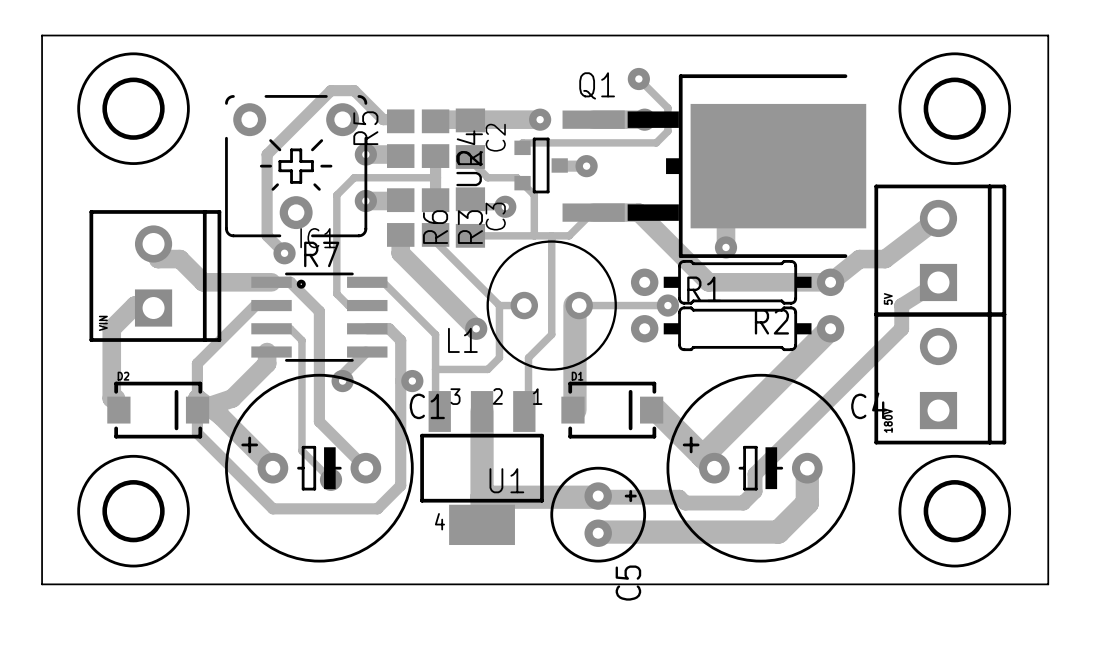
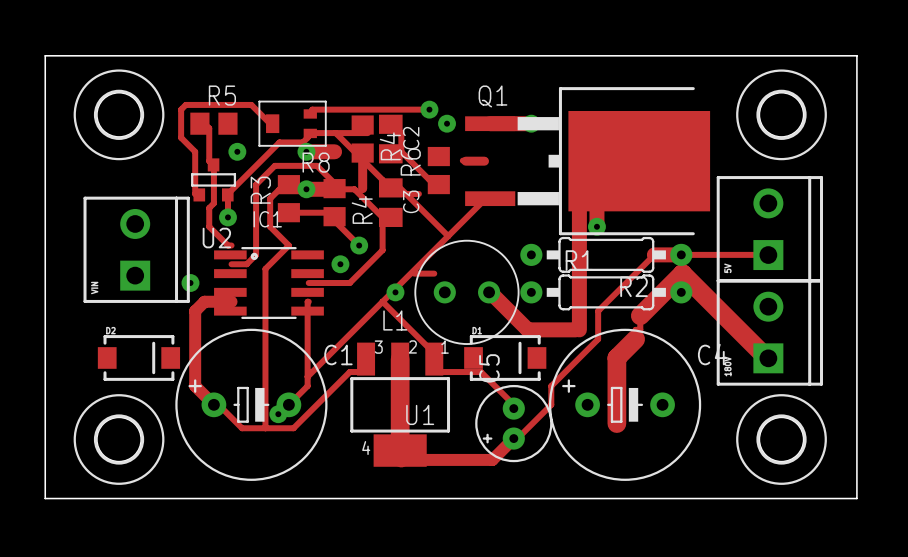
track: (638, 79) (667, 108) (667, 131) (656, 142) (522, 142) (522, 147) -> none
via: (638, 79) -> none
track: none -> (429, 109) (312, 109) (310, 113)
via: none -> (429, 109)
track: none -> (199, 123) (204, 123) (209, 128) (209, 161) (213, 165) (213, 203) (209, 208) (209, 226) (227, 245) (231, 245)
track: none -> (272, 123) (270, 123) (251, 104) (185, 104) (181, 109) (181, 137) (195, 151) (195, 193) (199, 194)
R8: none -> (292, 123)
track: (540, 119) (435, 119) (435, 121) -> none
track: (400, 121) (400, 119) (383, 119) (354, 90) (331, 90) (267, 154) (267, 235) (284, 253) -> none
track: none -> (335, 133) (382, 179) (382, 184) (396, 184) (448, 236)
track: none -> (367, 133) (312, 133) (302, 142) (279, 142) (227, 193) (227, 217)
track: none -> (397, 133) (401, 133) (401, 151) (429, 179) (438, 179) (438, 184)
R5 rotation: 0° (400, 138) -> 90° clockwise (213, 123)
R5 position: (400, 138) -> (213, 123)
via: none -> (237, 151)
track: (470, 156) (470, 160) (487, 177) (516, 177) (534, 195) (534, 235) -> none
U2 rotation: 0° (541, 165) -> 90° counterclockwise (213, 179)
U2 position: (541, 165) -> (213, 179)
R7: (296, 166) -> none
via: (586, 166) -> none
track: none -> (579, 161) (579, 329) (527, 329) (489, 292)
track: (435, 177) (354, 177) (336, 195) (336, 293) (348, 305) (367, 305) -> none
R6: none -> (438, 170)
track: none -> (288, 184) (288, 189) (279, 189) (270, 198) (270, 226) (288, 245) (265, 268) (265, 428)
via: (505, 206) -> none
track: (592, 212) (569, 235) (470, 235) -> (489, 198) (485, 198) (307, 376)
track: (593, 212) (638, 212) (708, 282) (797, 282) -> (401, 368) (401, 459) (492, 459) (513, 438) (517, 438) (551, 404) (551, 386) (598, 339) (598, 311) (654, 254)
R3 position: (435, 217) -> (288, 198)
track: (938, 218) (885, 259) (859, 259) (830, 282) -> (768, 255) (681, 254)
R6 name: R6 (435, 227) -> R4 (362, 209)
R3 name position: R3 (470, 227) -> R3 (260, 190)
track: none -> (288, 212) (335, 212) (326, 212) (359, 245)
track: none -> (382, 213) (382, 250) (349, 283) (308, 283)
track: (400, 234) (400, 253) (476, 328) -> none
track: (435, 234) (435, 241) (499, 305) (499, 357) (487, 369) (435, 369) -> none
track: none -> (382, 217) (354, 189) (335, 189) (335, 184) (317, 165) (274, 165) (256, 184) (256, 254) (246, 264) (231, 264)
track: (551, 235) (551, 334) (528, 357) (528, 410) (524, 411) -> none
track: (153, 243) (158, 259) (179, 259) (203, 282) (290, 282) (319, 311) (319, 421) (365, 468) -> none
via position: (284, 253) -> (227, 217)
via: none -> (359, 245)
track: (367, 282) (383, 282) (435, 334) (435, 410) (439, 411) -> none
track: (938, 282) (901, 305) (901, 328) (755, 473) (755, 491) (743, 503) (685, 503) (679, 497) (598, 497) -> none
via: none -> (340, 264)
track: (271, 305) (255, 305) (197, 363) (197, 433) (272, 508) (377, 508) (400, 485) (400, 340) (389, 328) (367, 328) -> none
L1 position: (551, 305) -> (466, 292)
track: (667, 305) (574, 305) (574, 410) (572, 410) -> none
via: (667, 305) -> none
track: (153, 308) (149, 308) (146, 305) (134, 305) (111, 328) (111, 398) (116, 398) (118, 410) -> none
via: none -> (190, 283)
track: (271, 328) (290, 328) (301, 340) (301, 450) (331, 479) -> none
track: (830, 328) (702, 456) -> none
track: none -> (231, 301) (204, 301) (195, 311) (195, 386) (213, 404) (218, 404) (242, 428) (293, 428) (349, 372) (363, 372) (367, 368)
track: none -> (308, 301) (307, 386) (288, 404)
track: none -> (382, 301) (434, 353) (434, 367) (438, 372) (481, 372) (513, 404) (513, 408)
track: (271, 352) (267, 352) (267, 363) (232, 398) (197, 410) (197, 398) (220, 415) (272, 468) -> none
track: (367, 352) (342, 375) (342, 381) -> none
via: (342, 381) -> none
via: (412, 381) -> none
track: (651, 410) (656, 410) (714, 468) -> none
track: none -> (768, 358) (682, 273) (640, 315) (640, 329) (635, 329) (635, 339) (616, 357) (615, 425)
C1 position: (319, 468) -> (251, 404)
track: (807, 468) (807, 503) (778, 532) (598, 533) -> none
track: (482, 497) (598, 497) -> none
C5 rotation: 0° (598, 514) -> 180° (513, 423)

